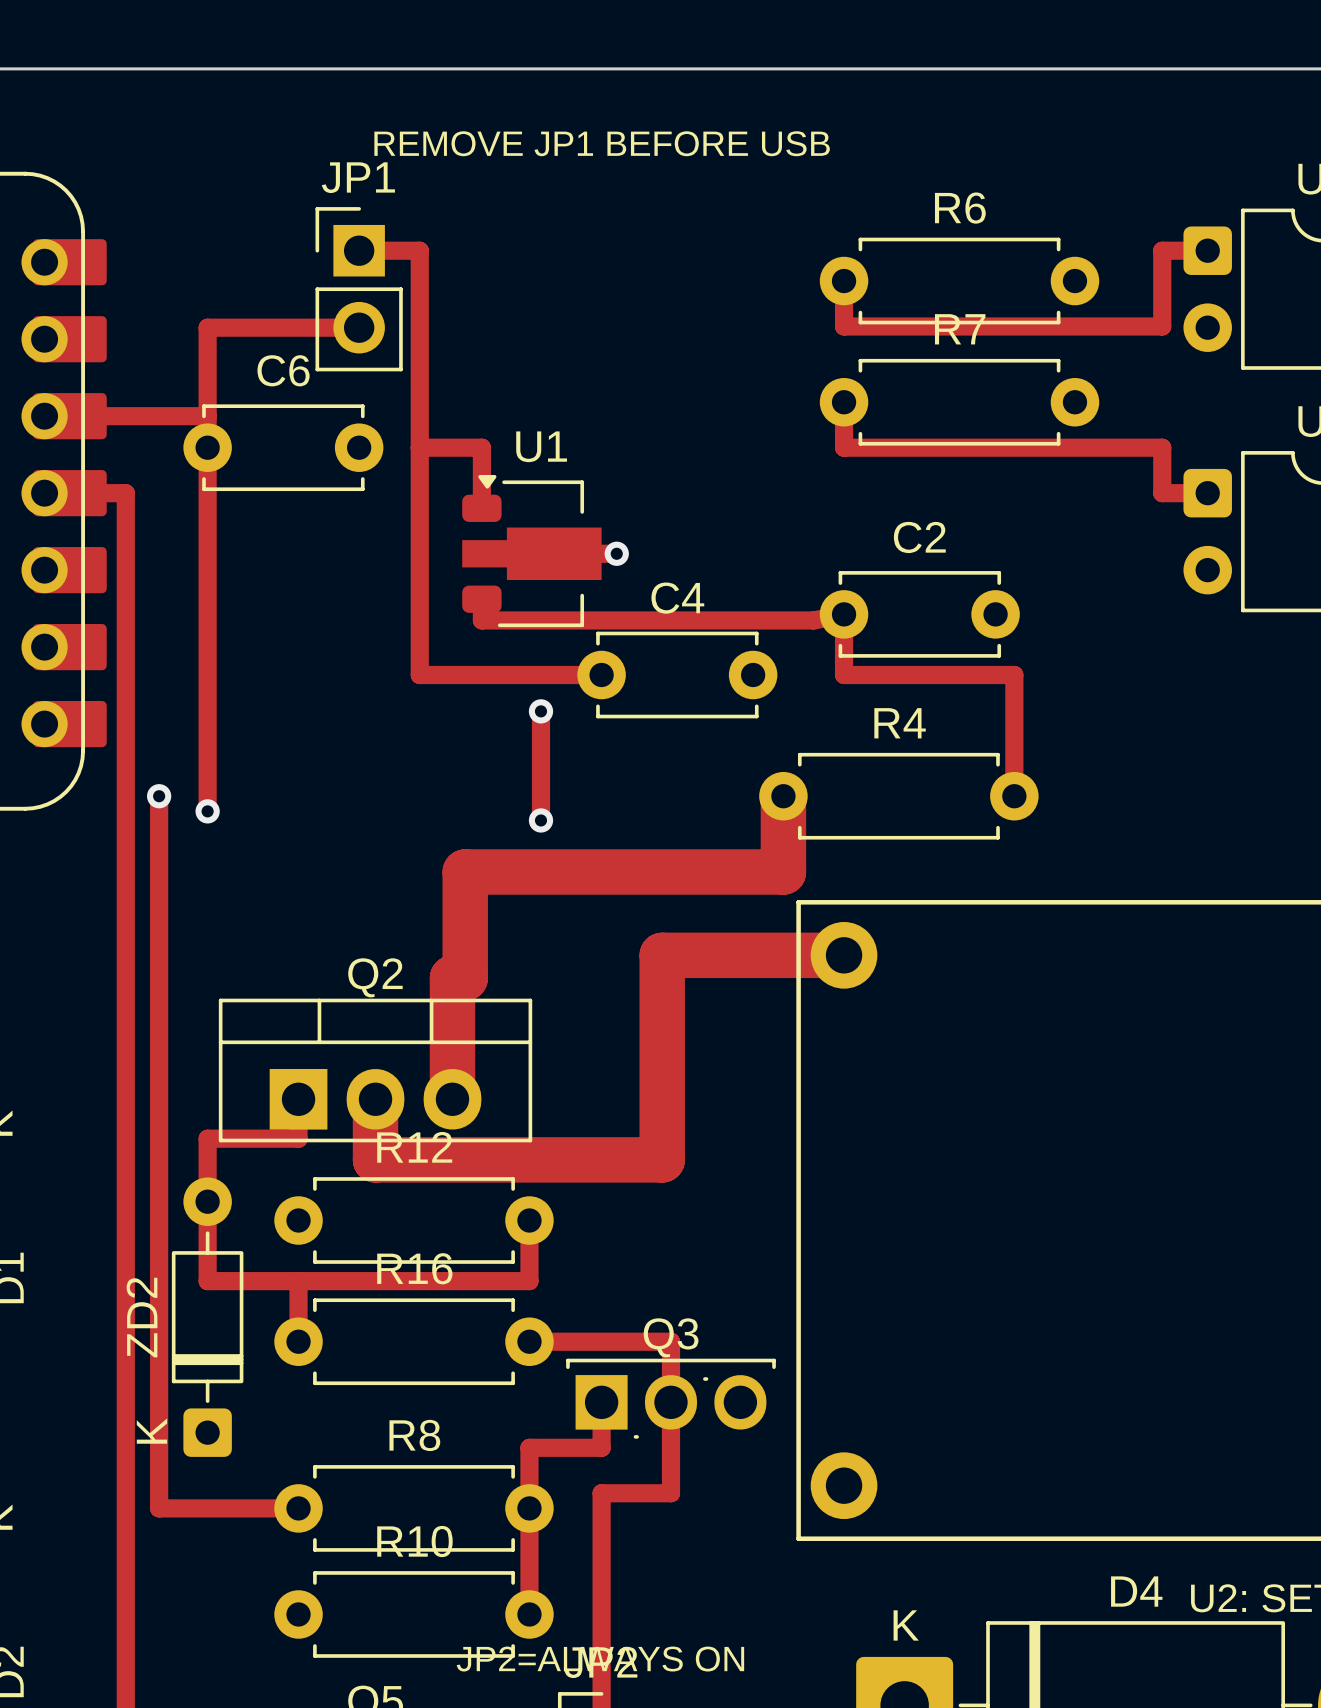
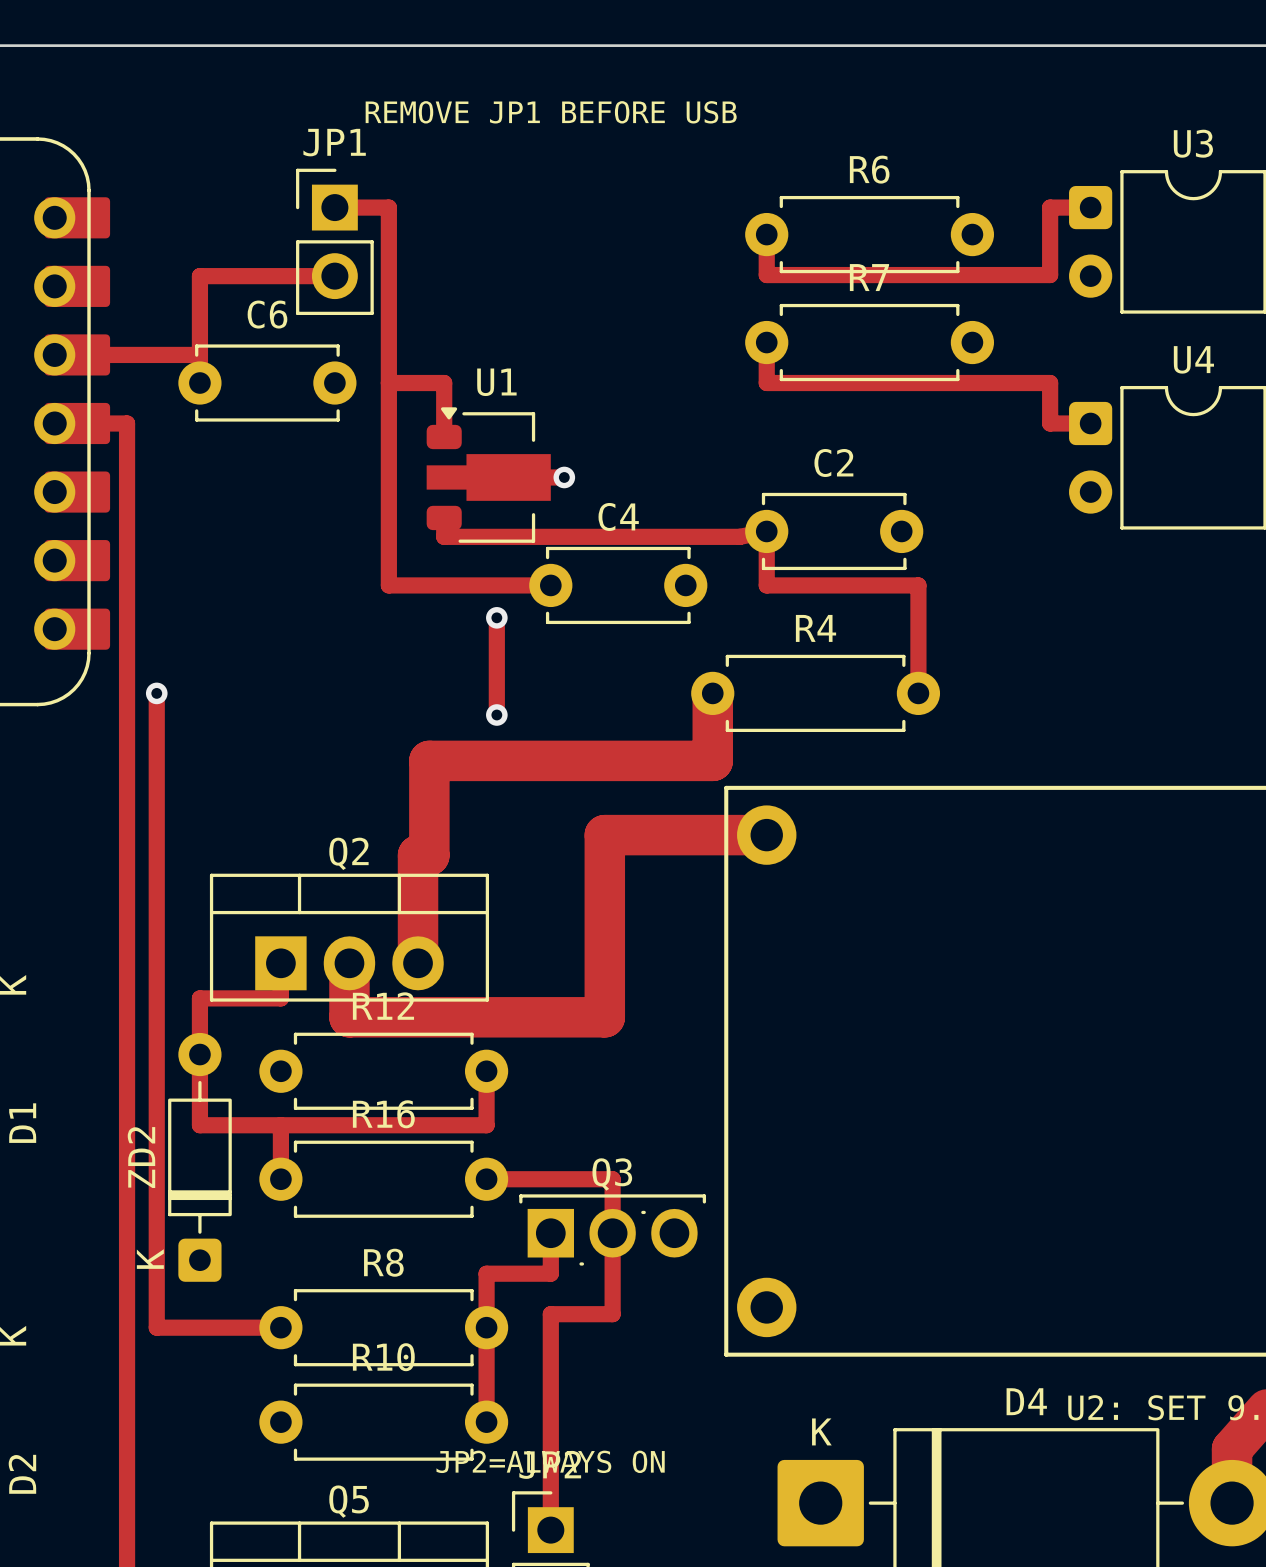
track: (207, 447) (207, 811) -> none
via: (207, 811) -> none

